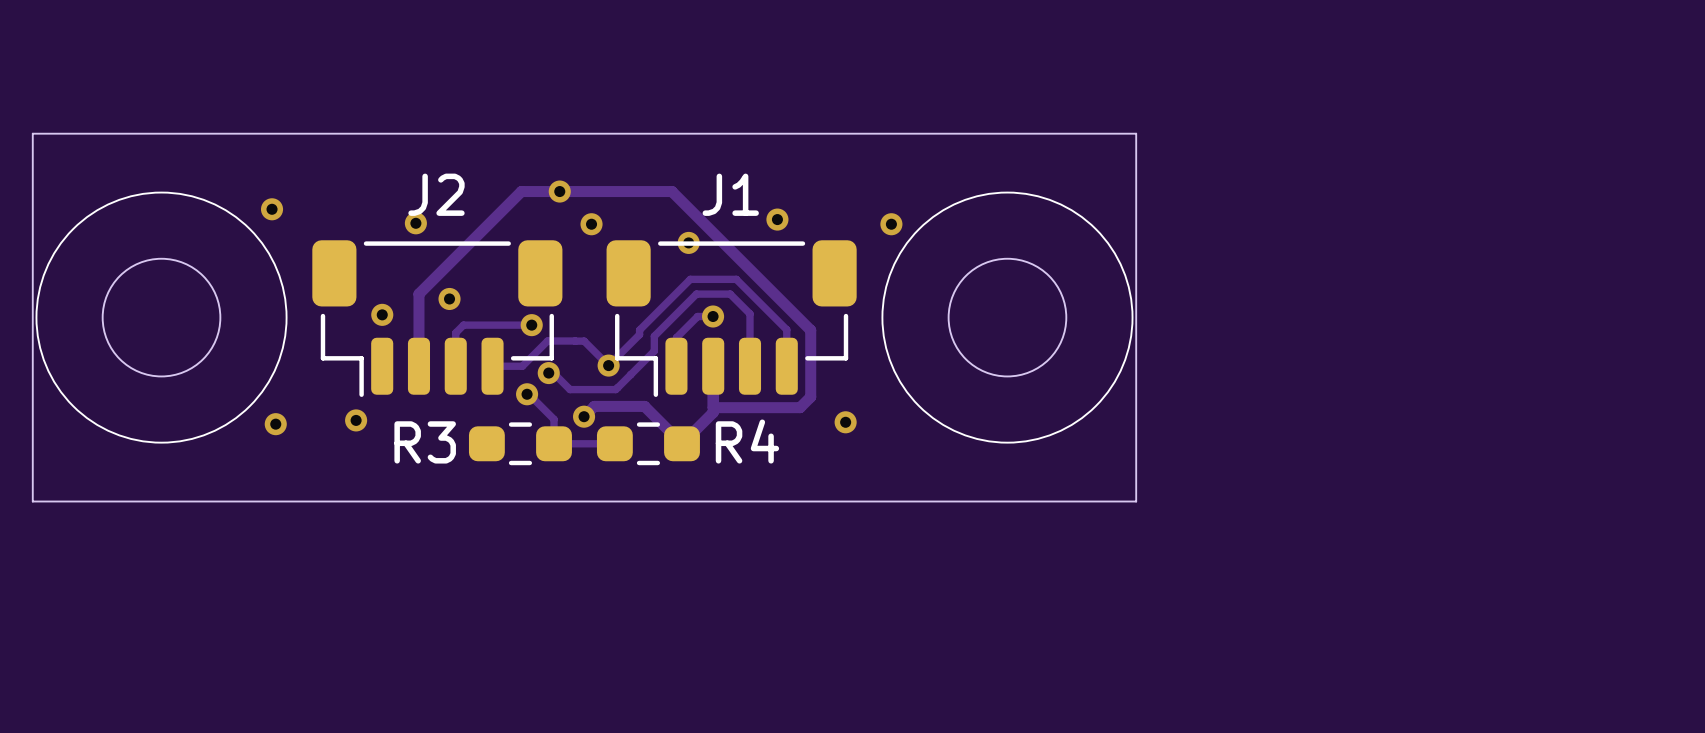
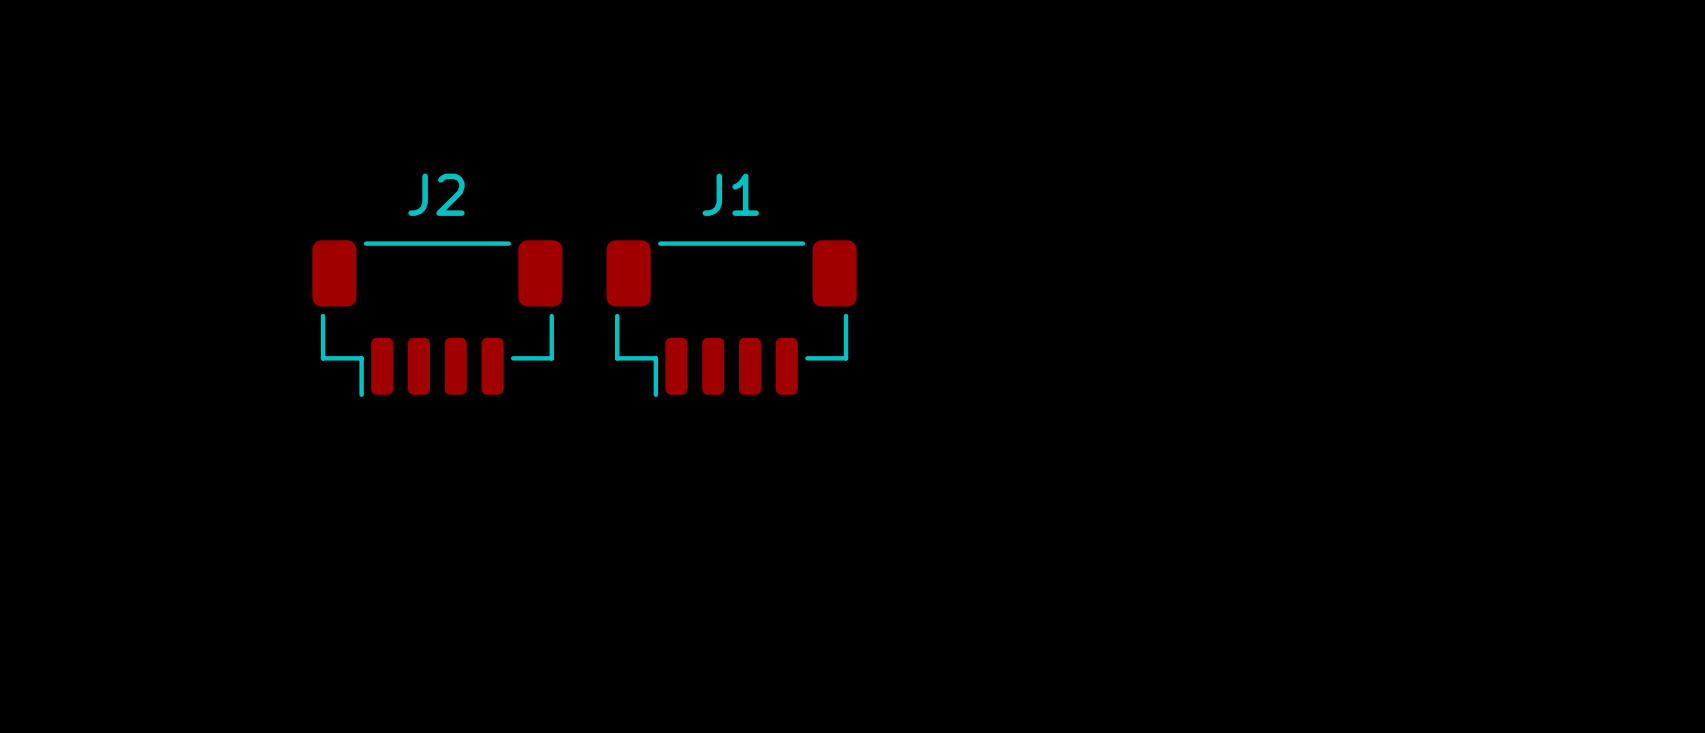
board edge: (32, 133) (1136, 133) (1136, 501) (32, 501) (32, 133) -> none
drawing: [35, 191, 288, 444] -> none
via: (559, 191) -> none
drawing: [881, 191, 1134, 444] -> none
via: (272, 209) -> none
via: (777, 219) -> none
via: (415, 223) -> none
via: (591, 224) -> none
via: (891, 224) -> none
via: (688, 242) -> none
round board edge: [101, 257, 222, 378] -> none
round board edge: [947, 257, 1068, 378] -> none
via: (449, 298) -> none
via: (382, 314) -> none
track: (713, 316) (697, 316) (676, 337) (676, 366) -> none
via: (713, 316) -> none
track: (531, 325) (463, 325) (455, 332) (455, 366) -> none
via: (531, 325) -> none
track: (575, 341) (547, 341) (522, 366) (492, 366) -> none
track: (575, 341) (584, 341) (608, 365) (639, 334) (639, 330) (690, 279) (736, 279) (786, 329) (786, 366) -> none
via: (608, 365) -> none
track: (418, 366) (418, 294) (521, 191) (671, 191) (810, 330) (810, 397) (800, 407) (713, 407) -> none
track: (713, 366) (713, 412) (682, 443) (644, 406) (594, 406) (584, 416) -> none
track: (750, 366) (750, 313) (730, 294) (696, 294) (654, 336) (654, 351) (615, 389) (570, 389) (553, 373) (548, 373) -> none
via: (548, 373) -> none
track: (527, 394) (554, 419) (554, 443) (614, 443) -> none
via: (527, 394) -> none
via: (584, 416) -> none
via: (356, 420) -> none
via: (845, 422) -> none
via: (275, 424) -> none
R3: (520, 443) -> none
R4: (648, 443) -> none

